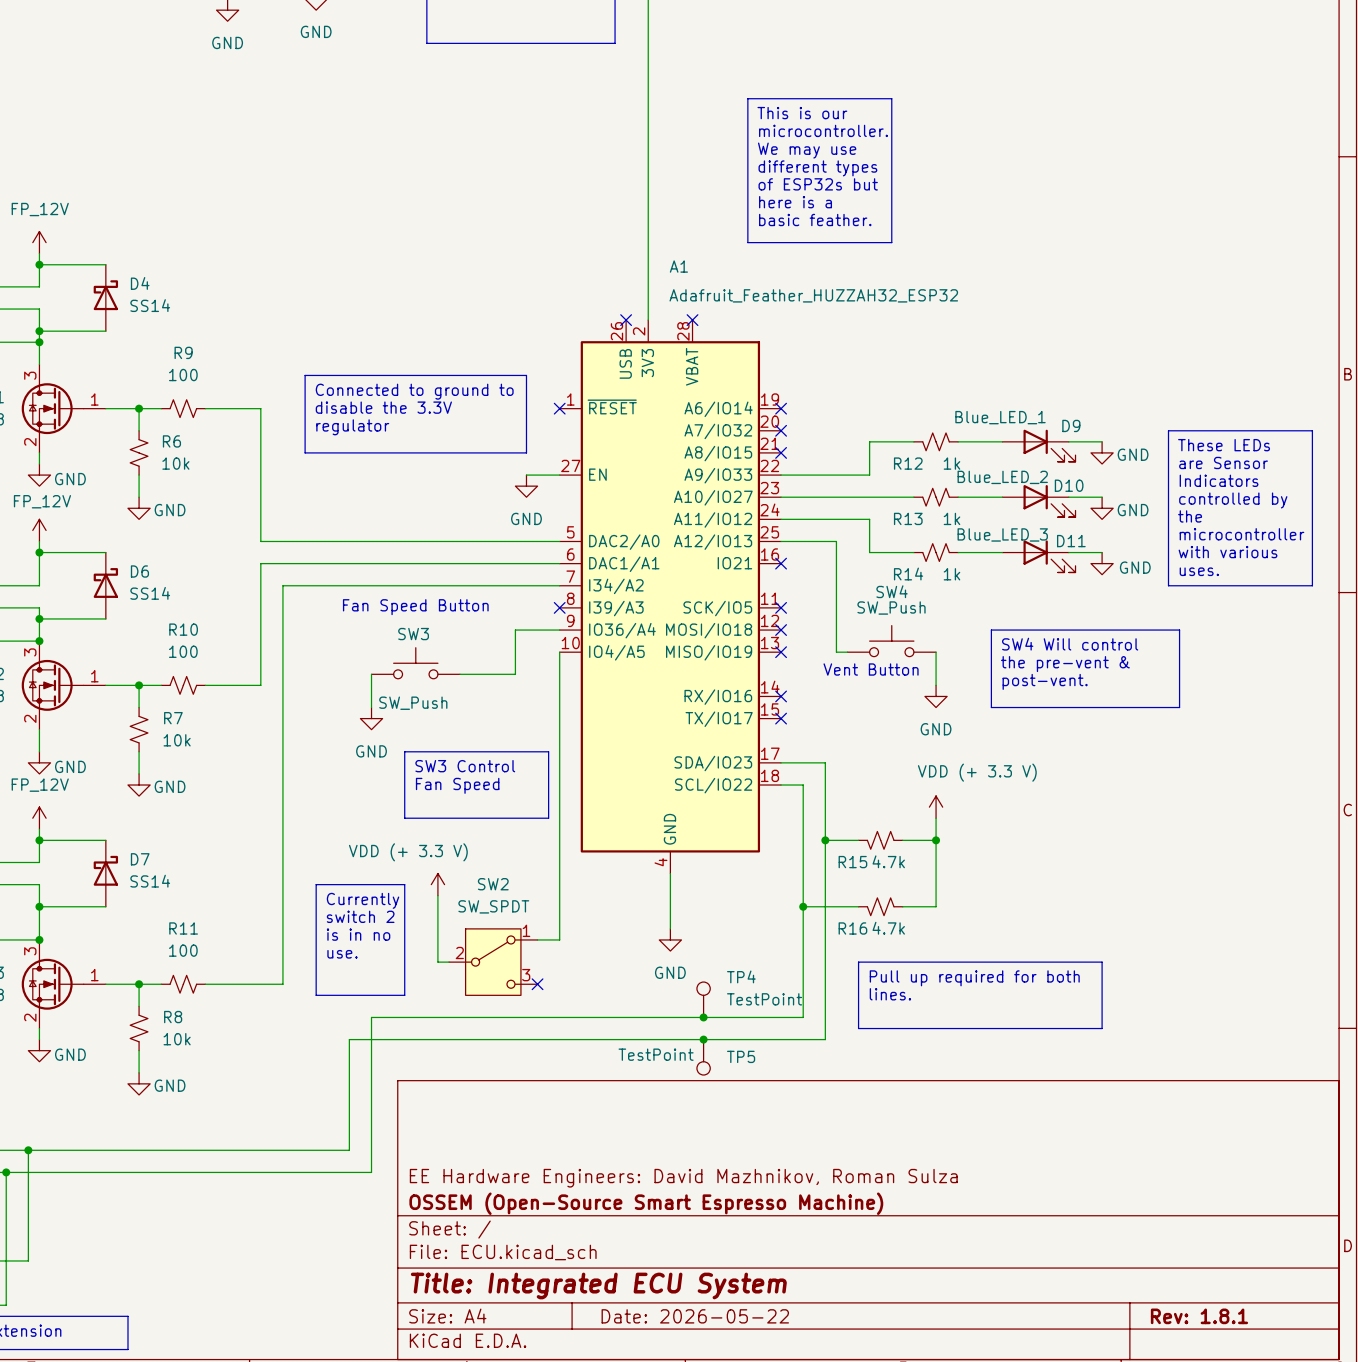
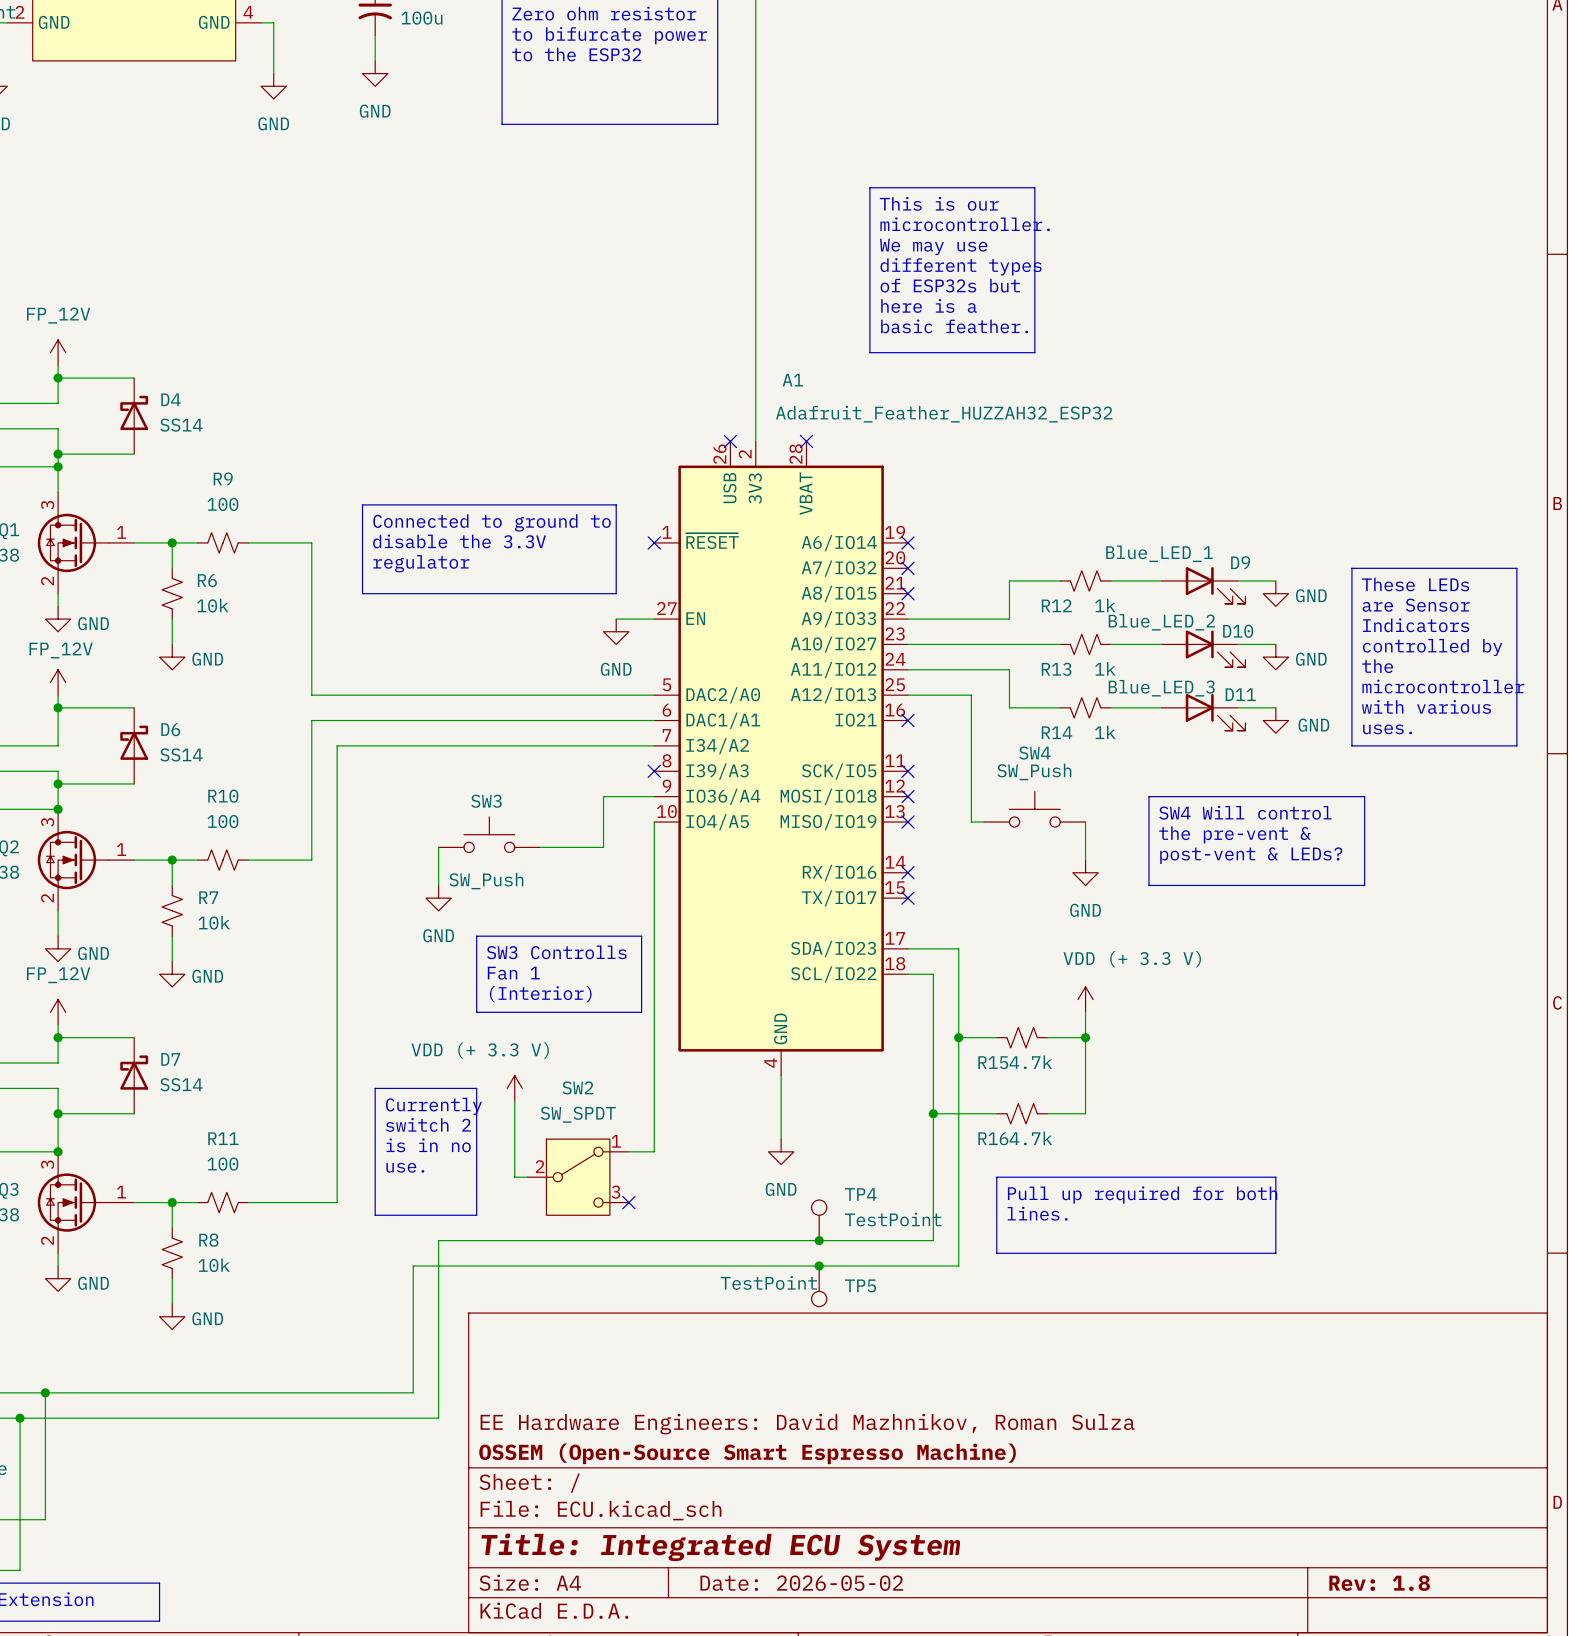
text: Fan Speed Button (415, 607) -> none
text: Vent Button (871, 669) -> none
text: post-vent. (1045, 681) -> post-vent & LEDs? (1251, 855)
text: SW3 Control (465, 766) -> SW3 Controlls (556, 952)
text: Fan Speed (457, 785) -> Fan 1 (513, 973)
text: none -> (Interior) (540, 994)
title block: Date: 2026-05-22 (695, 1316) -> Date: 2026-05-02 (801, 1583)
title block: Rev: 1.8.1 (1199, 1316) -> Rev: 1.8 (1379, 1583)

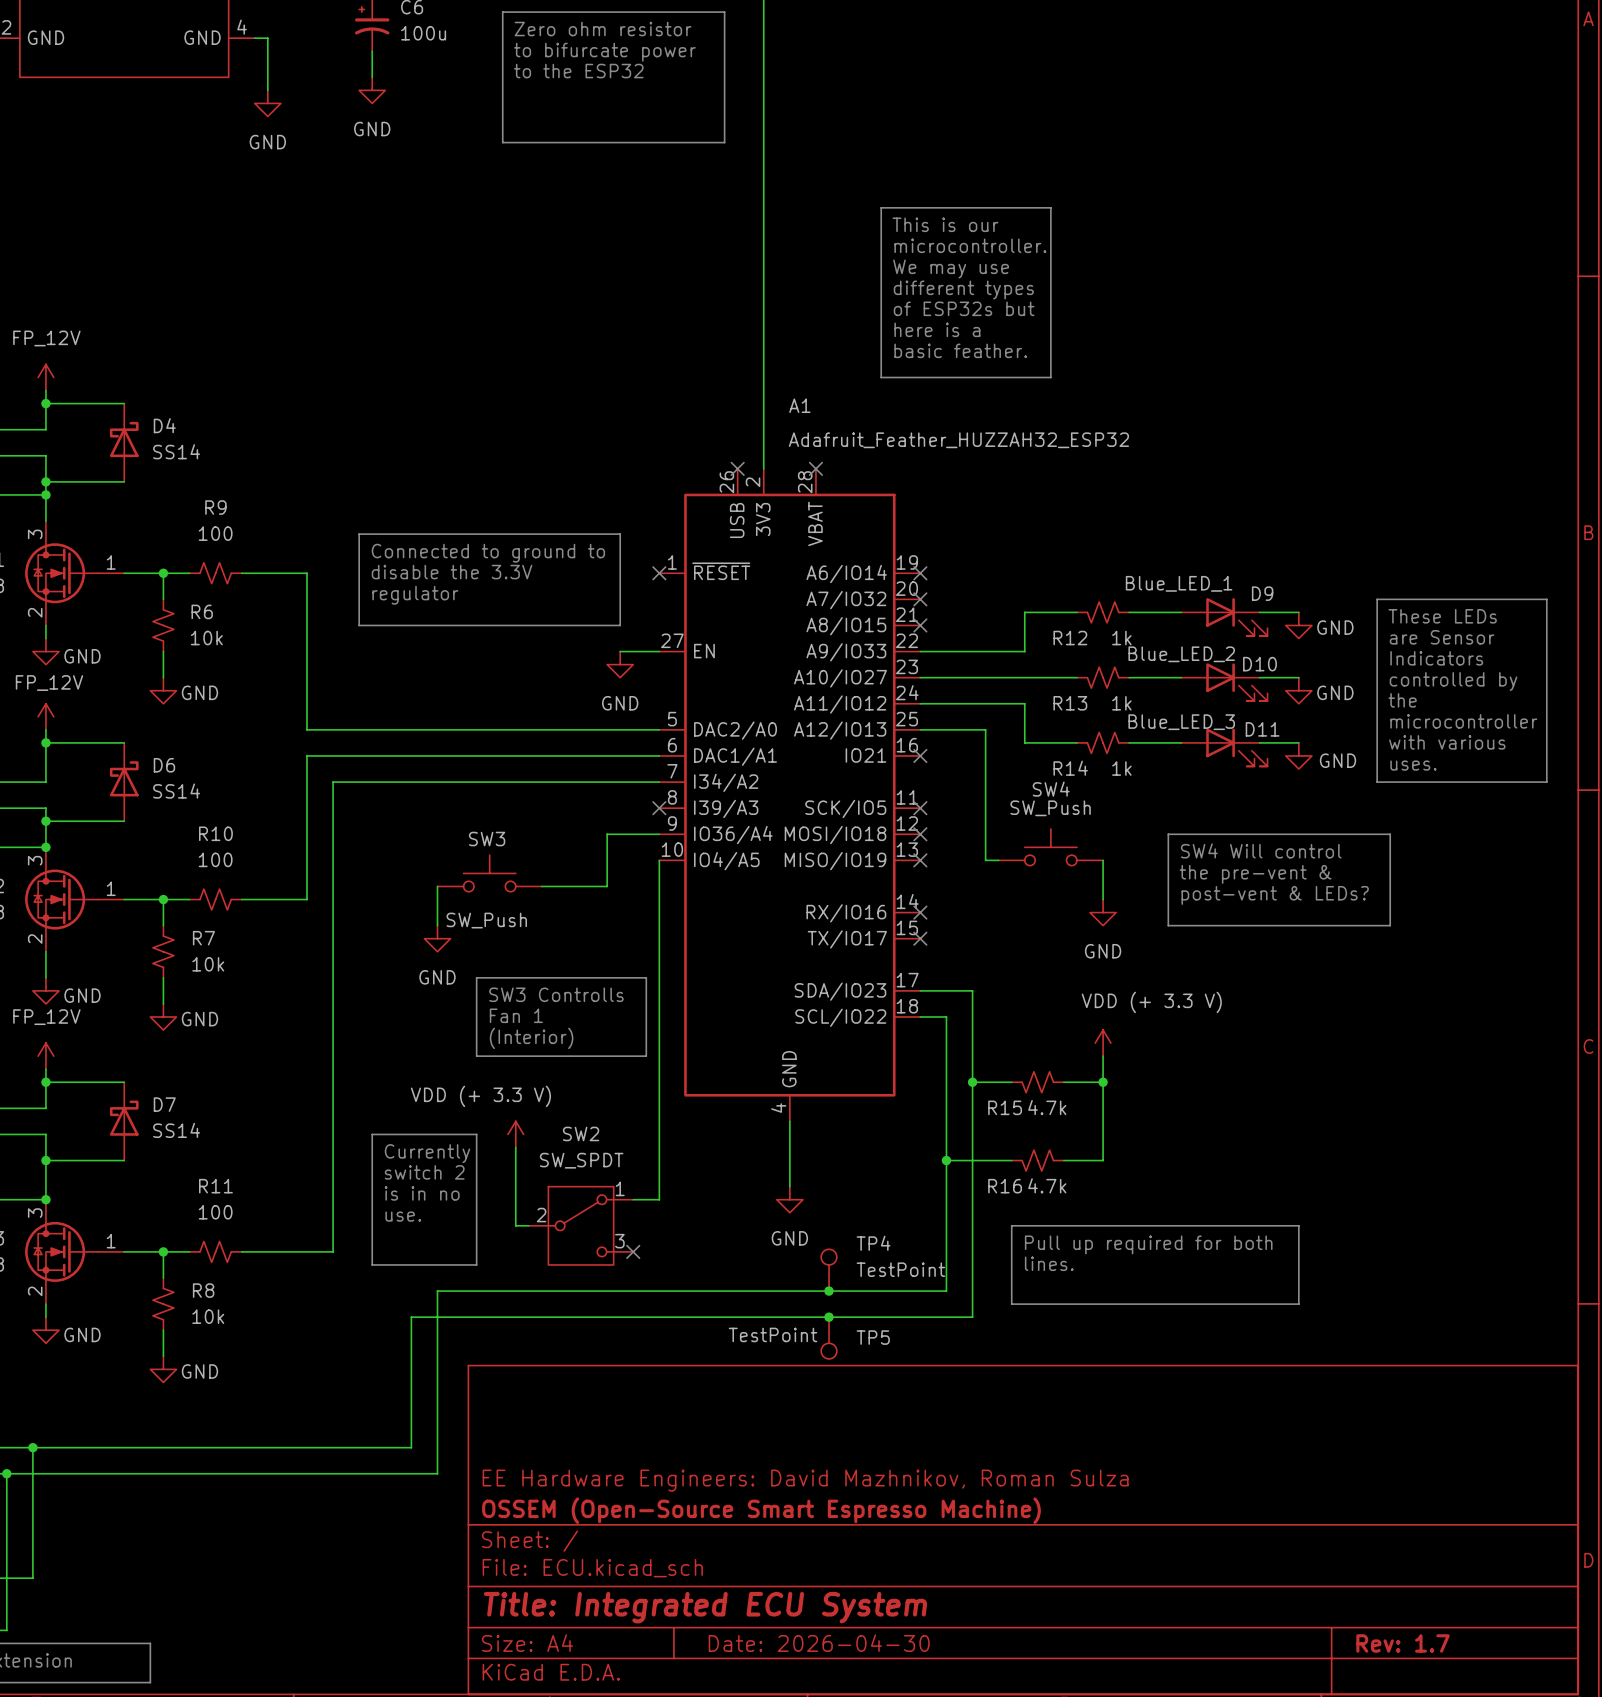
title block: Date: 2026-05-02 (801, 1583) -> Date: 2026-04-30 (819, 1643)
title block: Rev: 1.8 (1379, 1583) -> Rev: 1.7 (1403, 1643)

